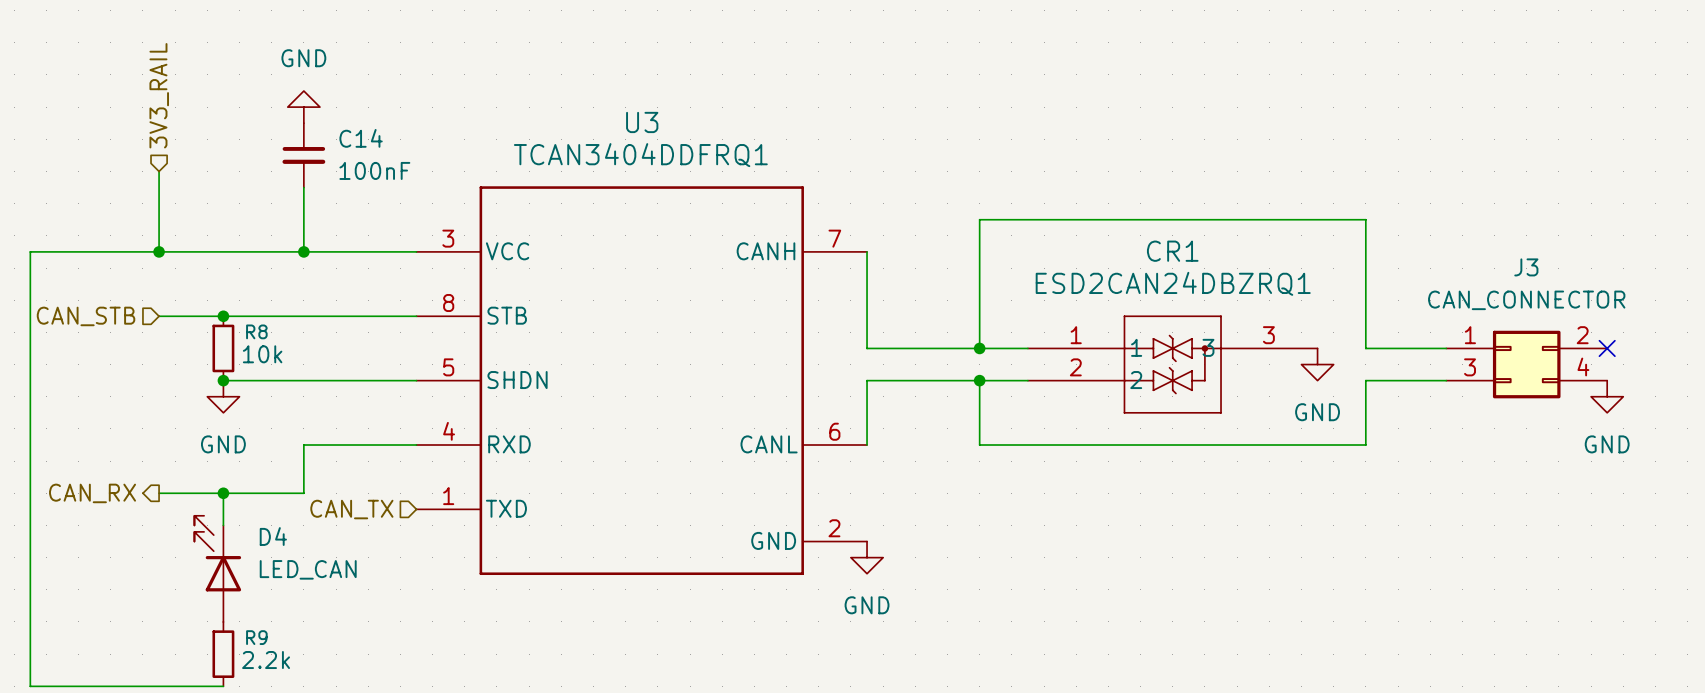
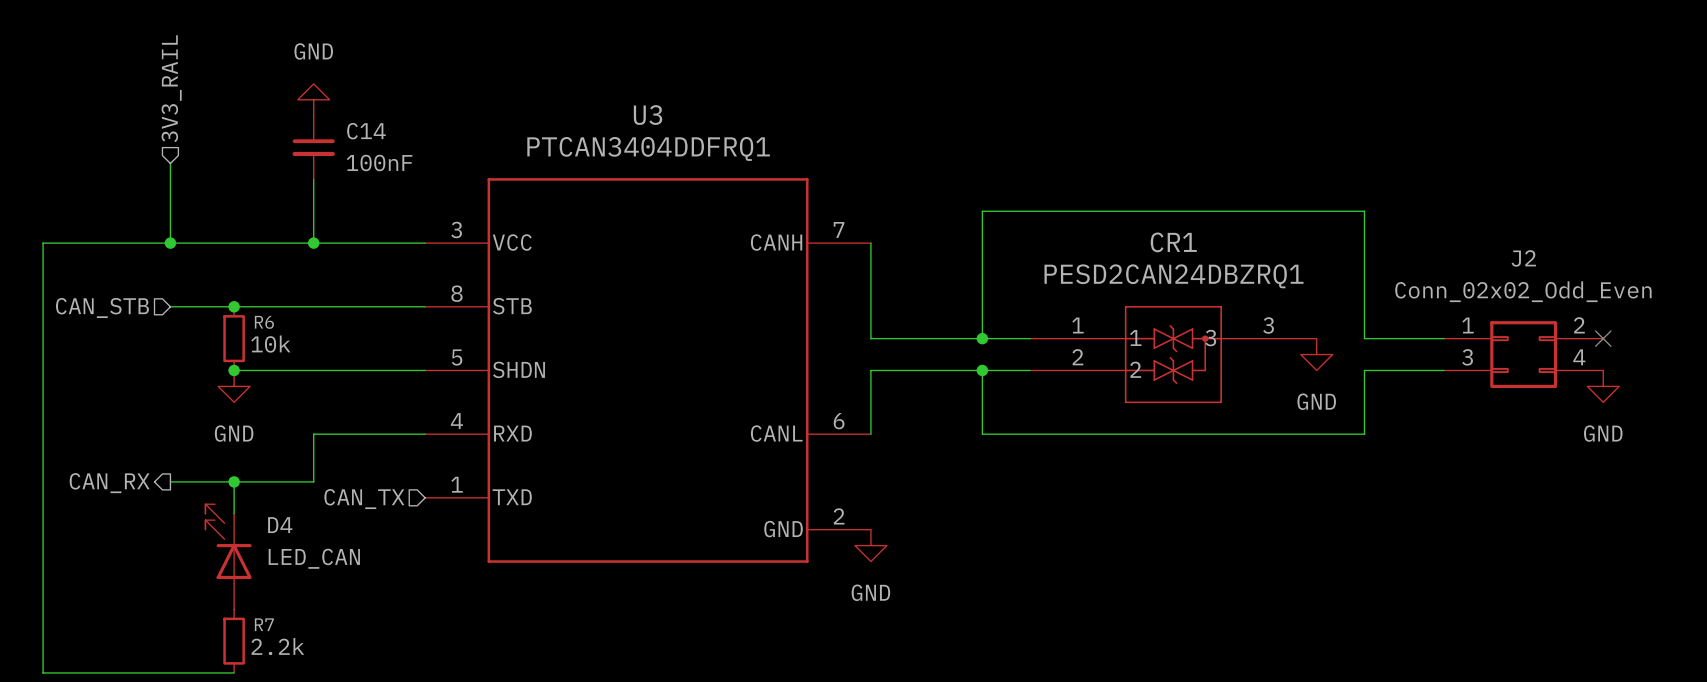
U3 value: TCAN3404DDFRQ1 (640, 155) -> PTCAN3404DDFRQ1 (648, 148)
J3 name: J3 (1526, 267) -> J2 (1523, 258)
CR1 value: ESD2CAN24DBZRQ1 (1173, 283) -> PESD2CAN24DBZRQ1 (1174, 276)
J3 value: CAN_CONNECTOR (1526, 300) -> Conn_02x02_Odd_Even (1523, 291)
R8 name: R8 (256, 331) -> R6 (264, 322)
R9 name: R9 (256, 637) -> R7 (264, 624)

